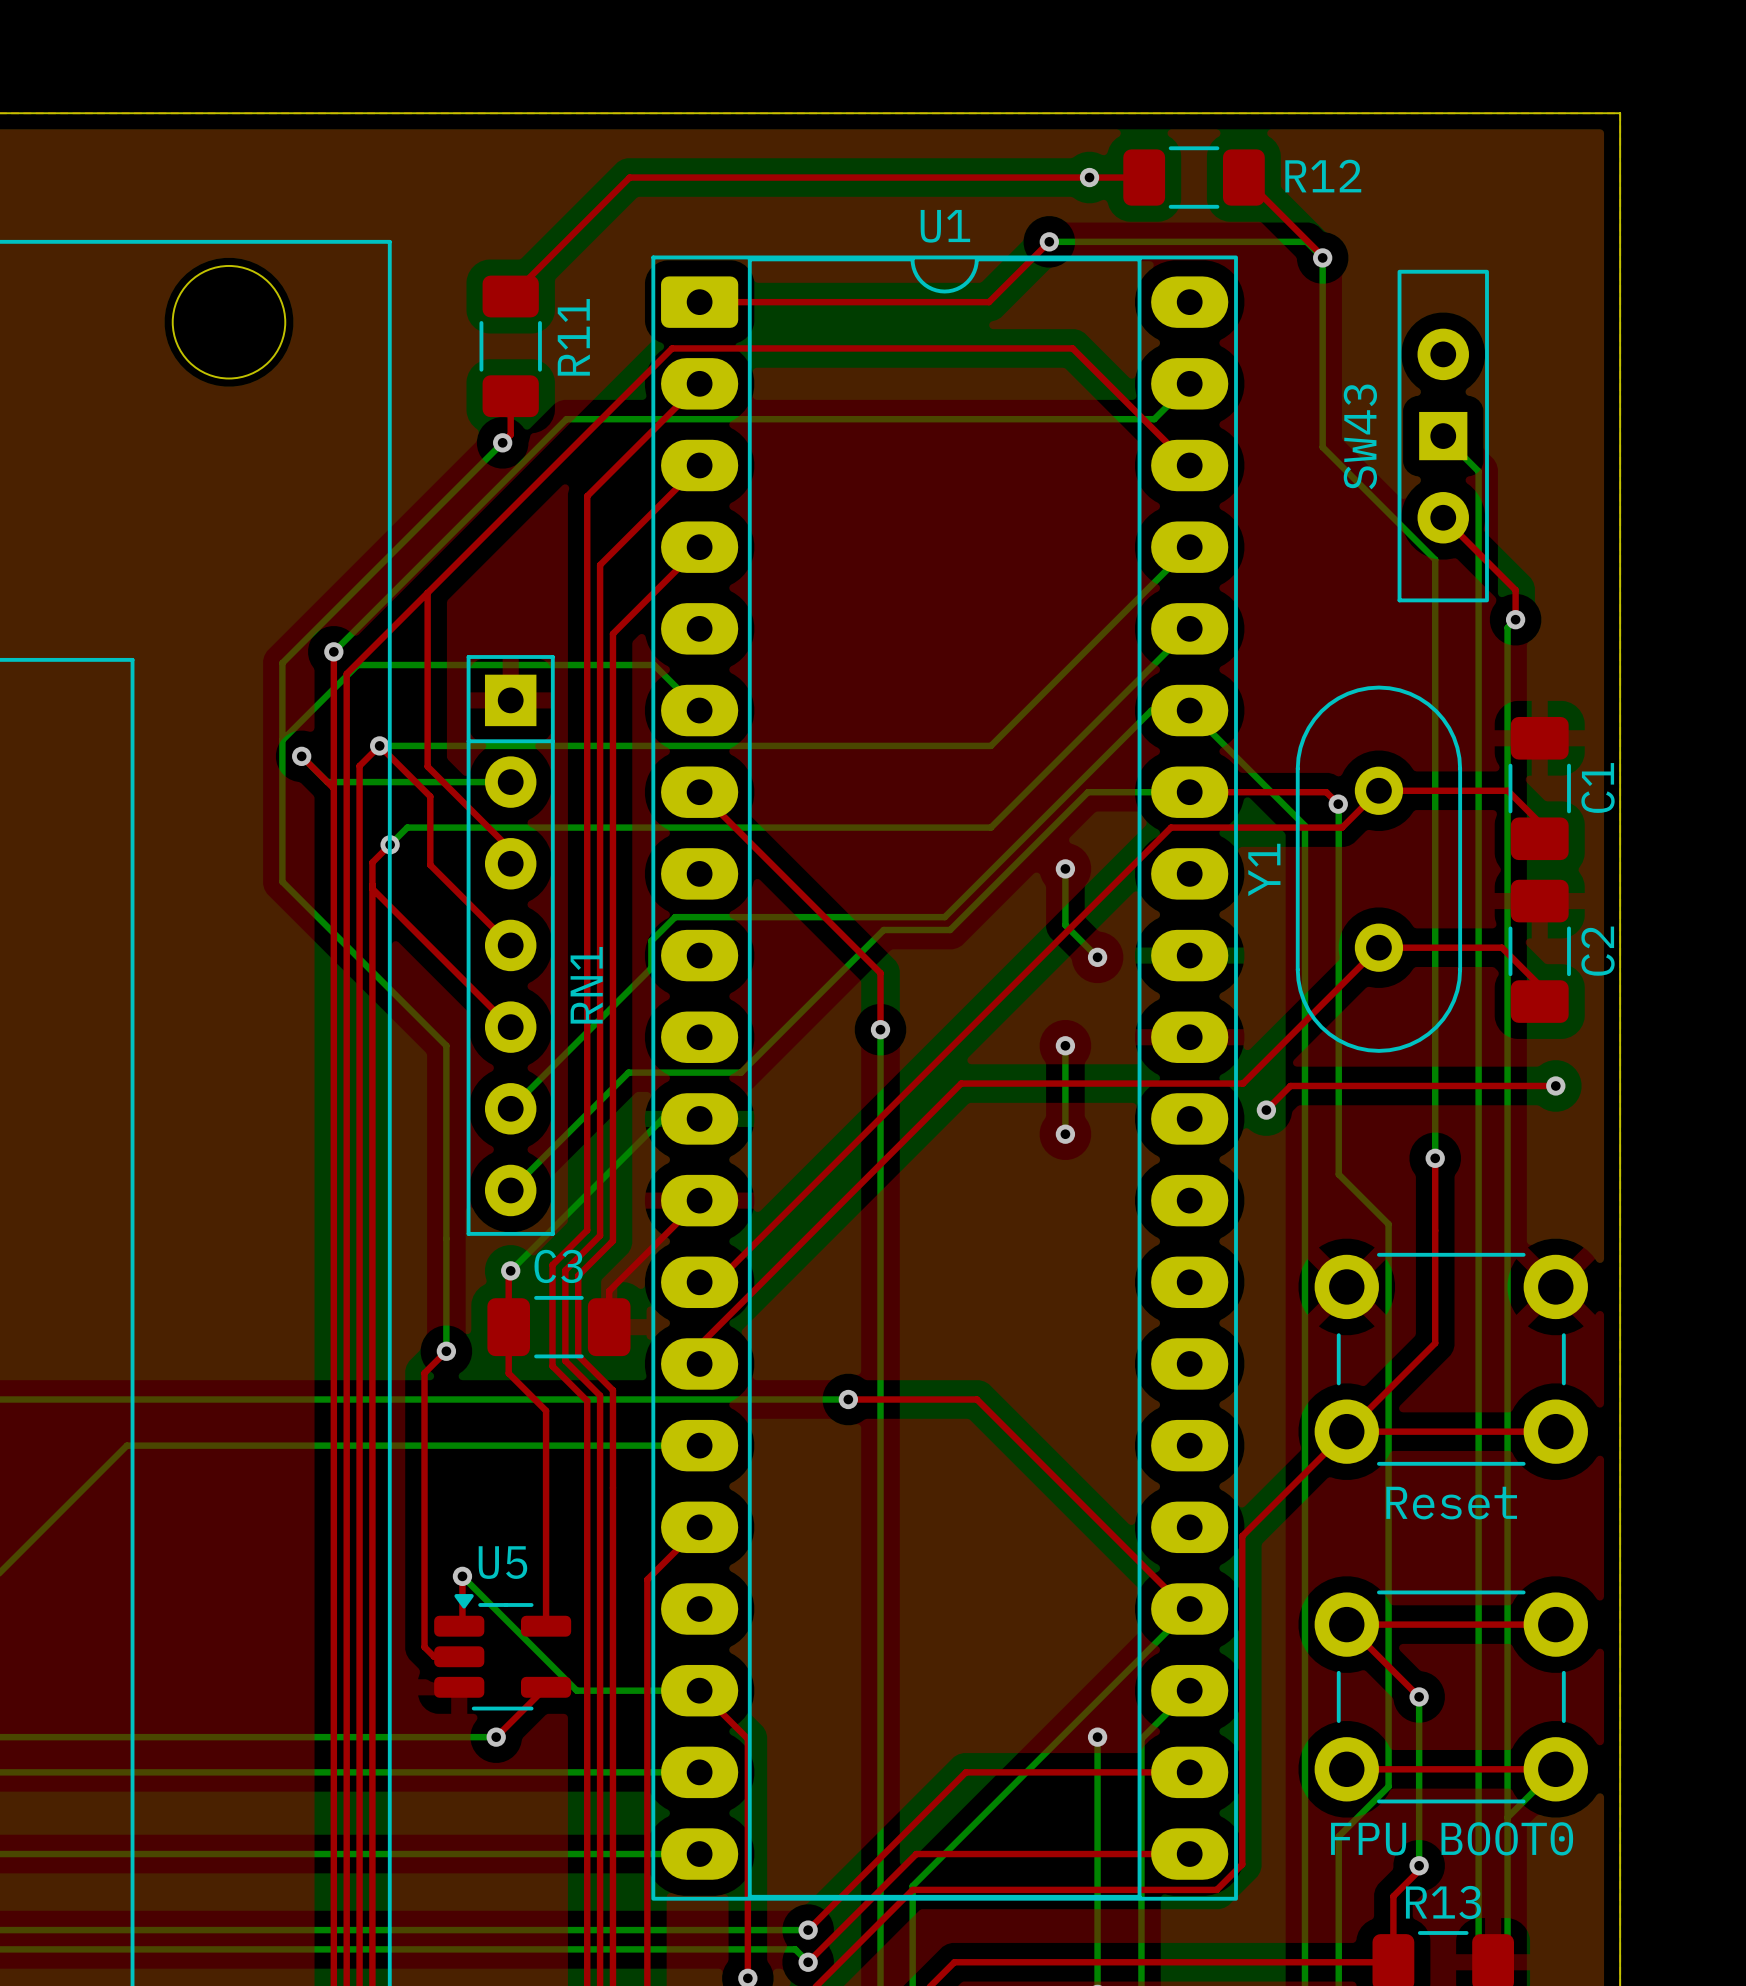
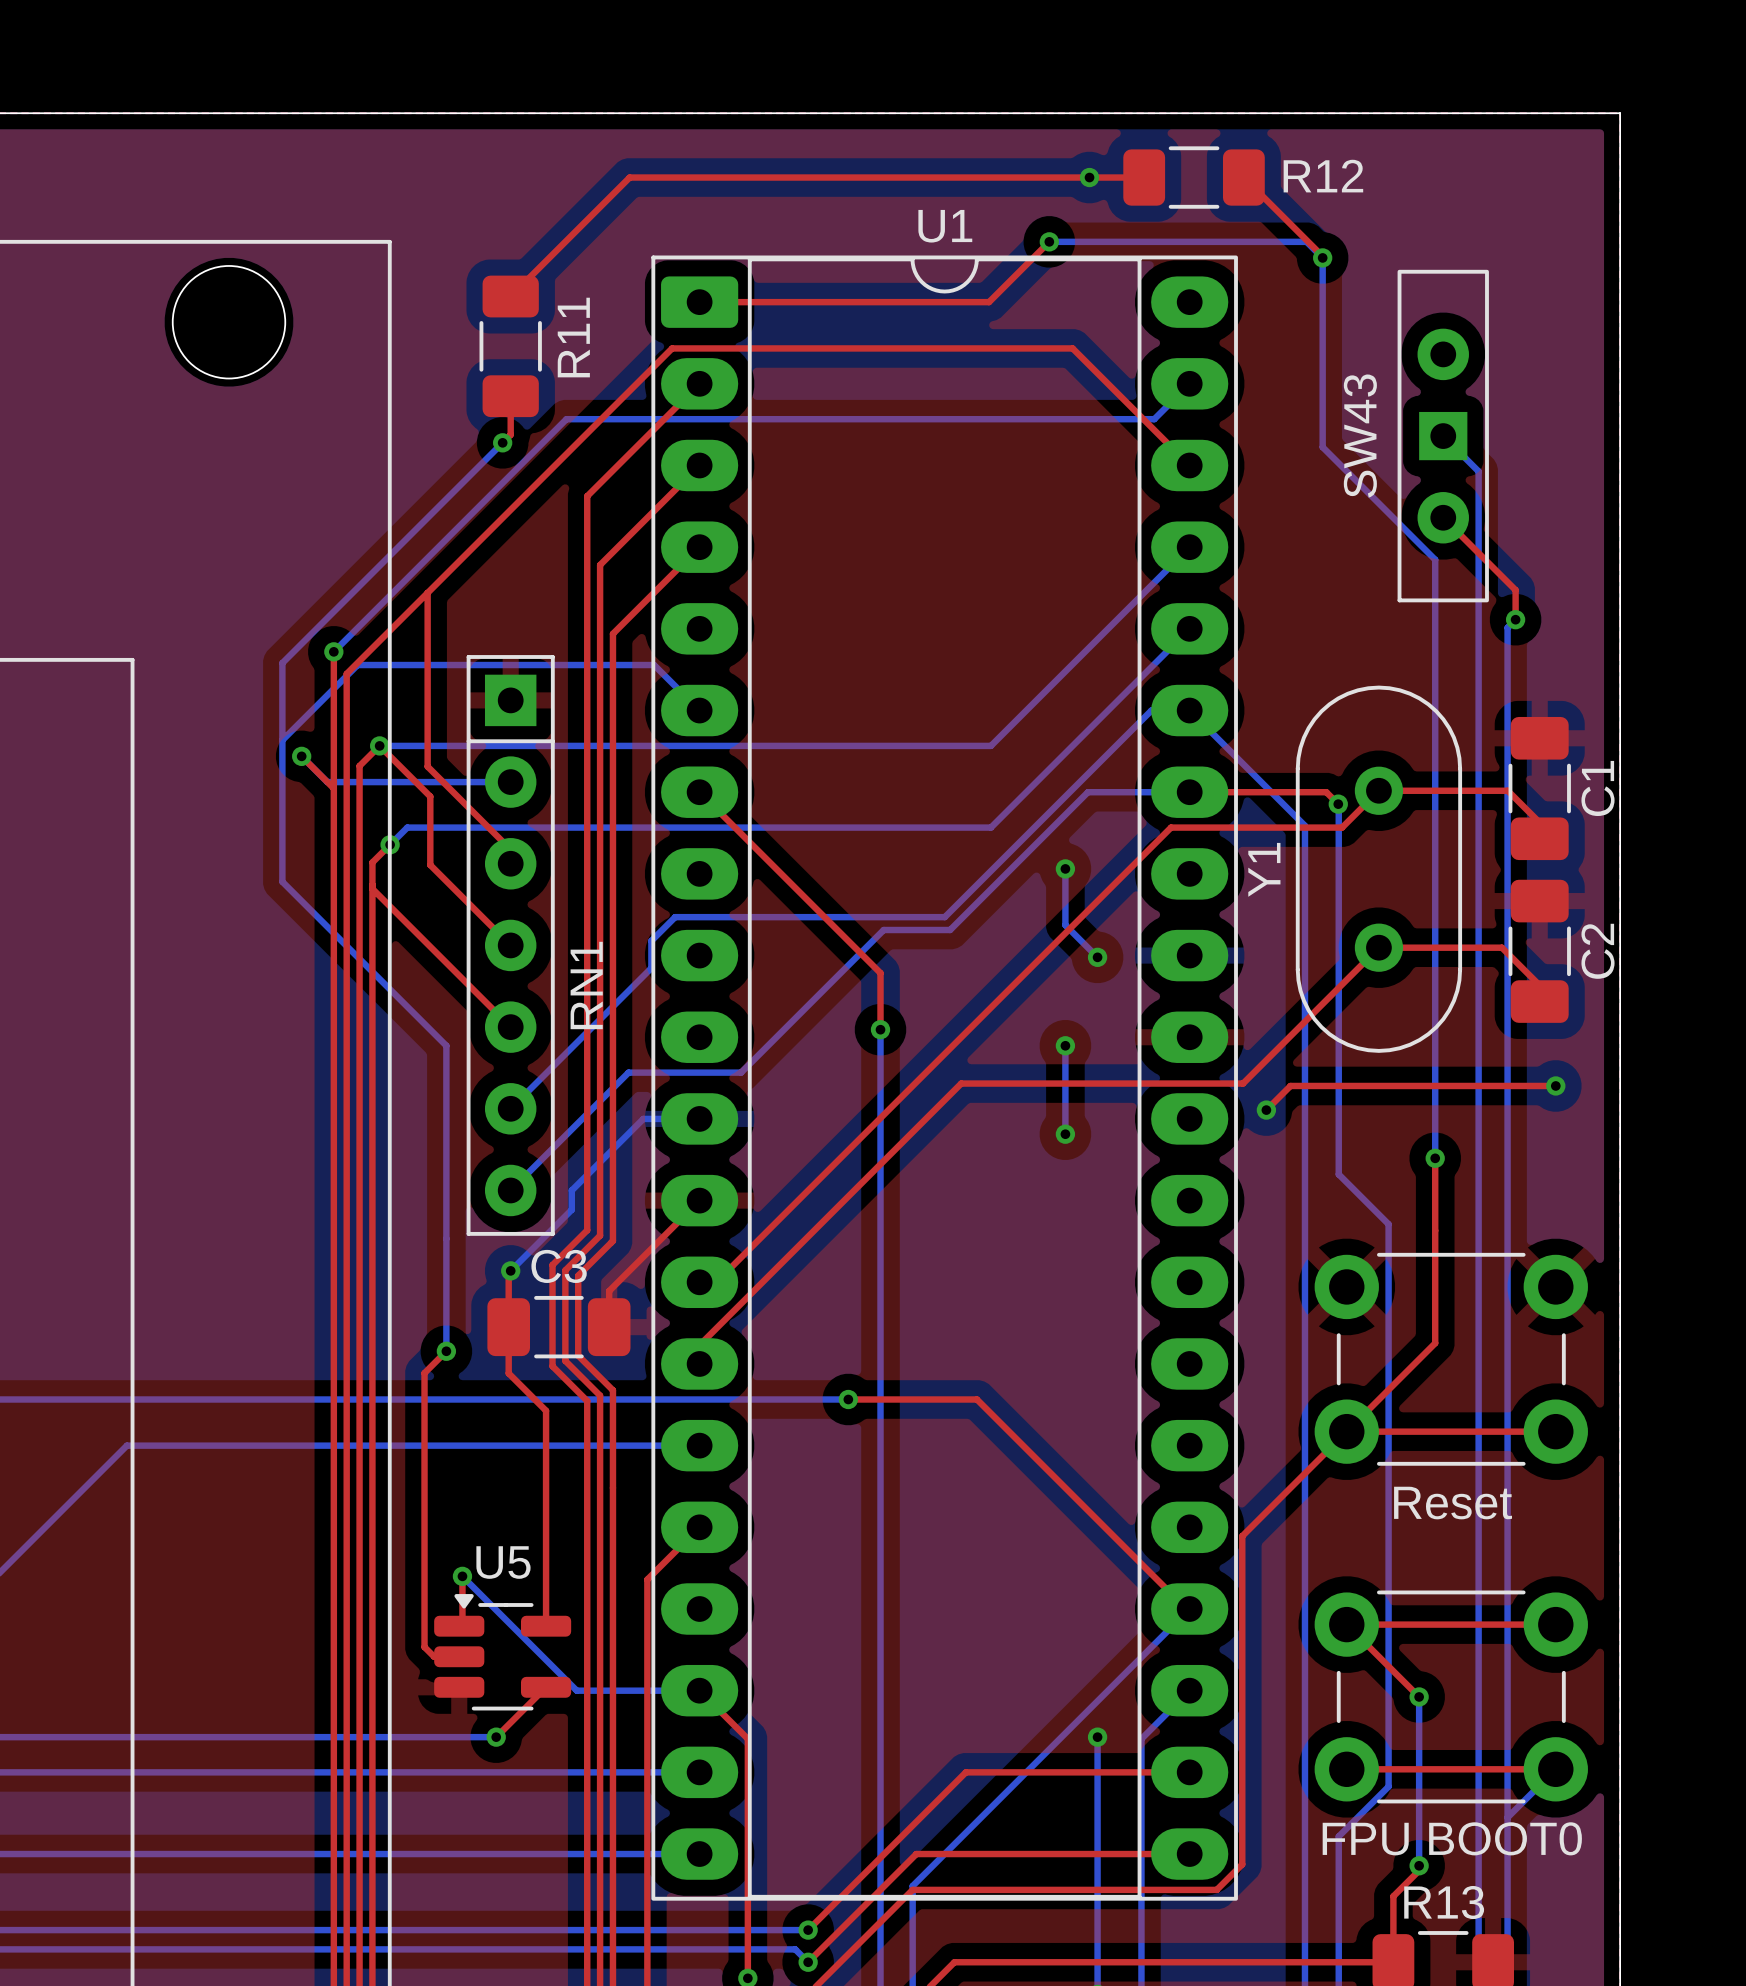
bottom track: (662, 1118) (571, 1209) -> (662, 1118) (643, 1118) (571, 1190) (571, 1209)

